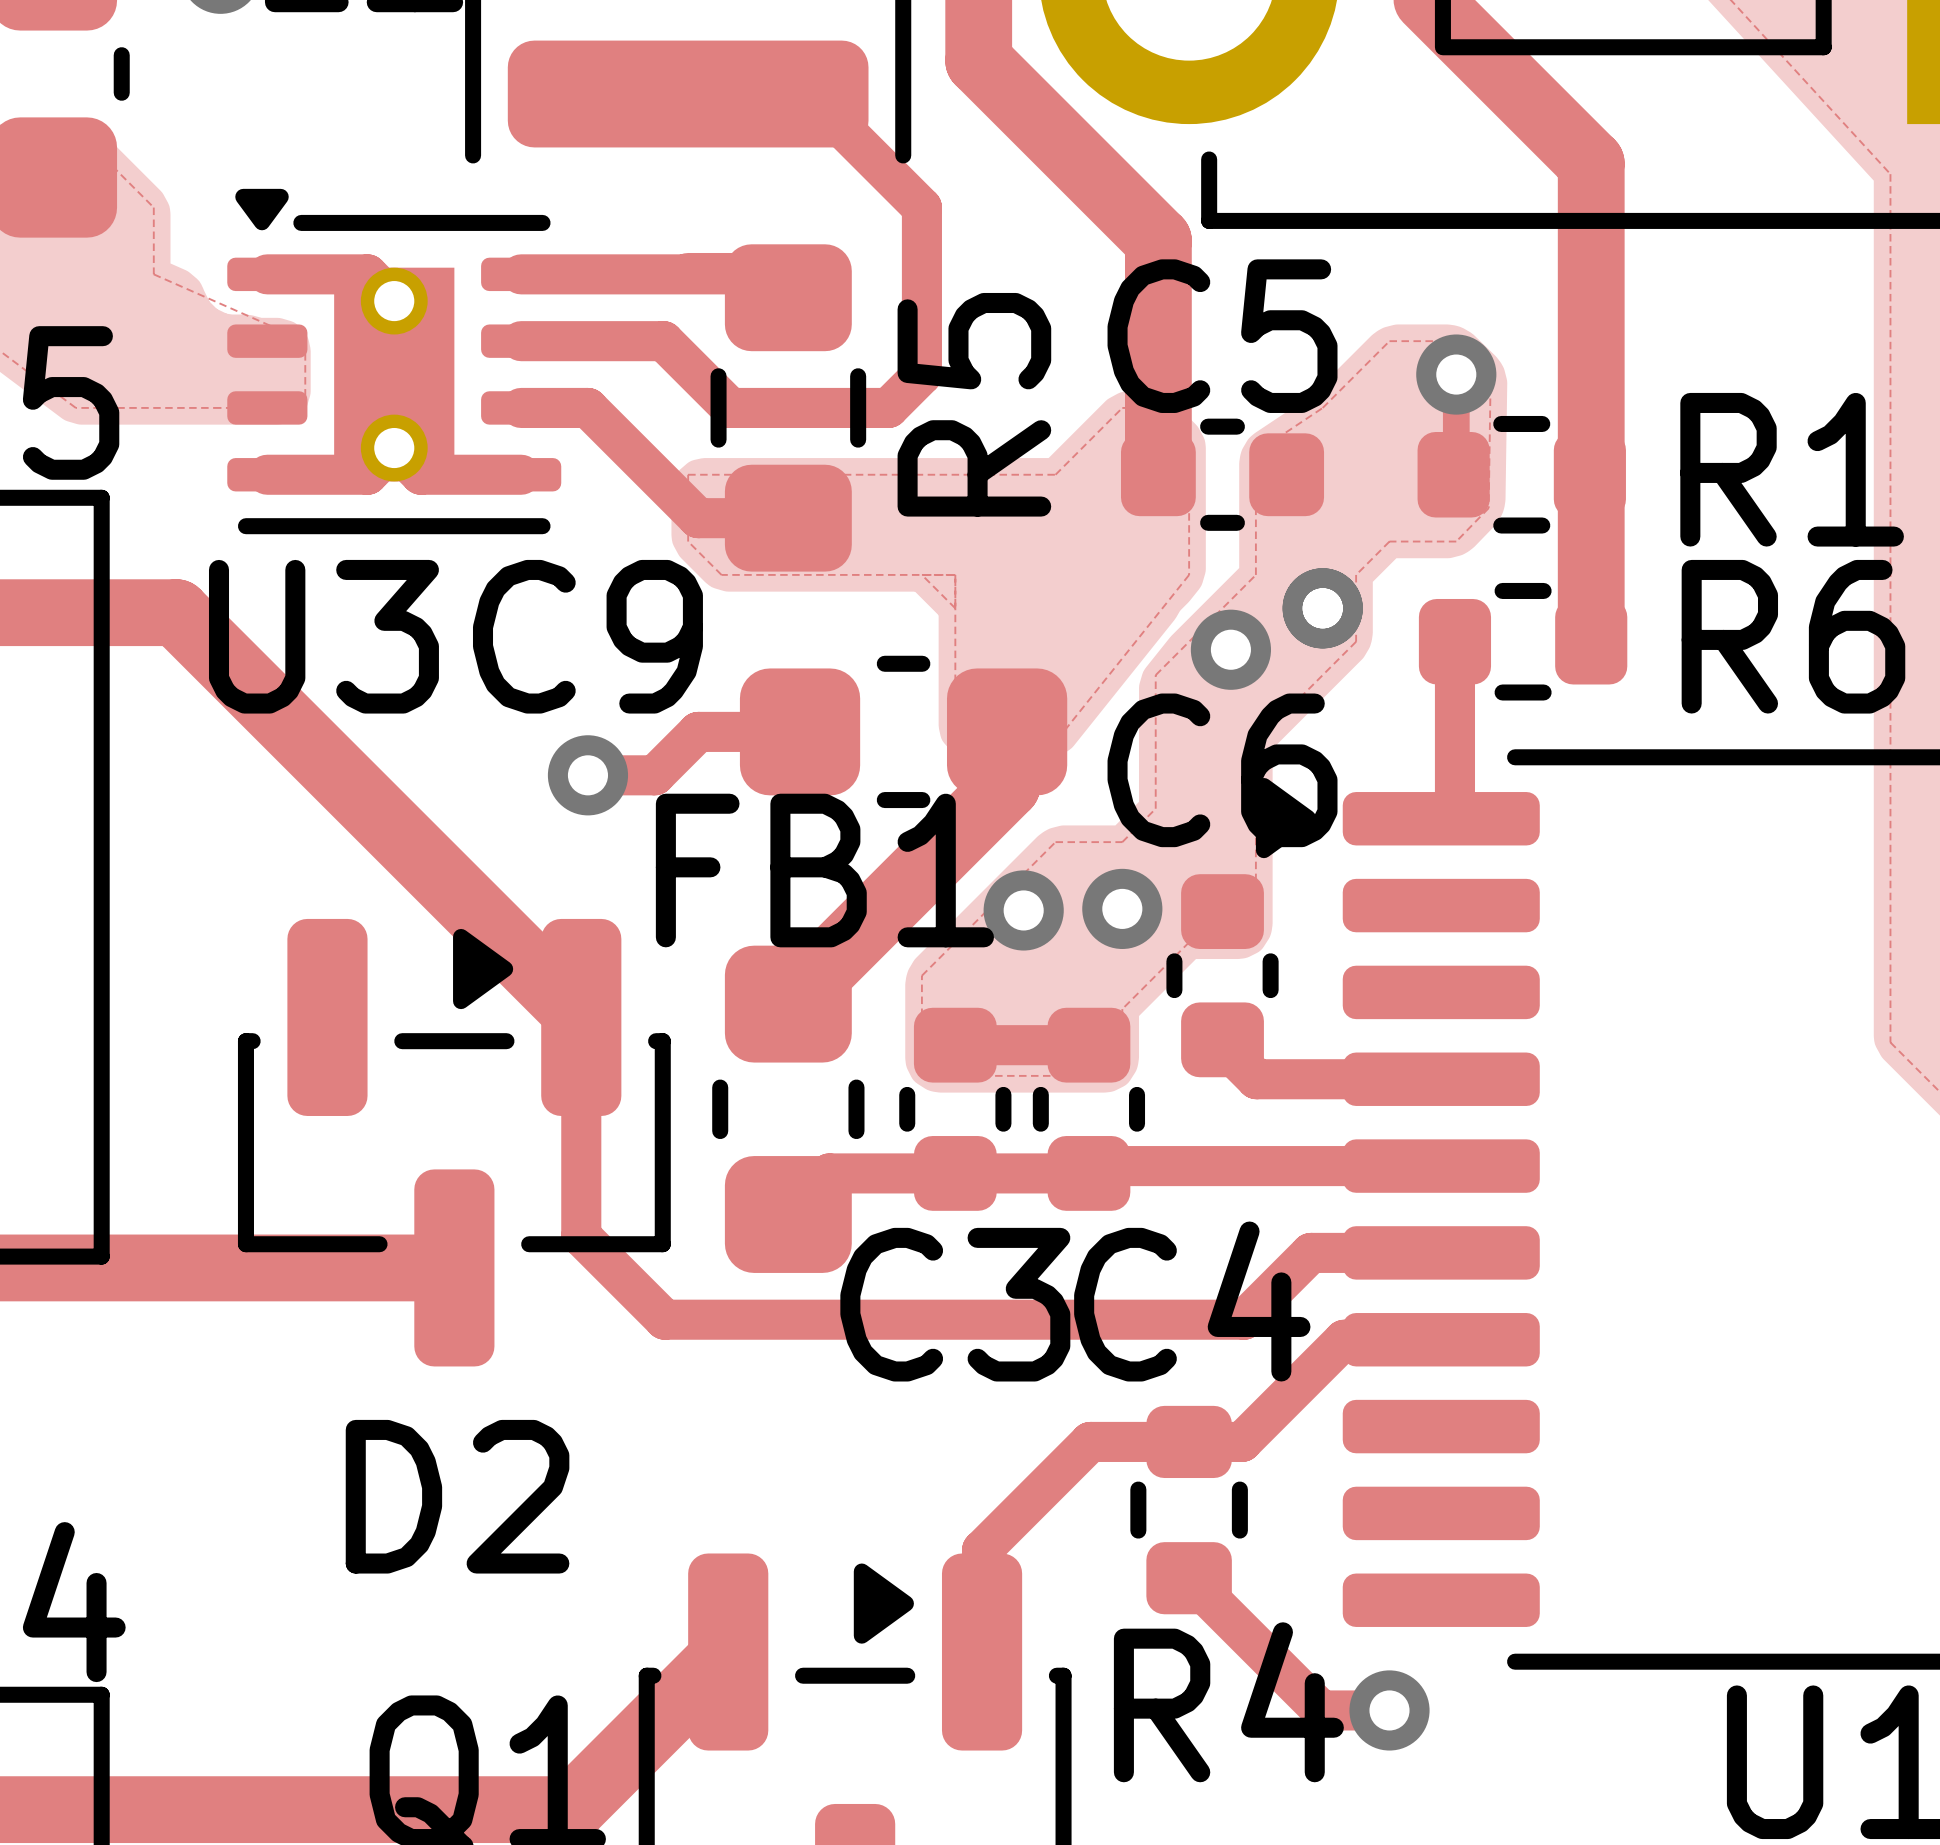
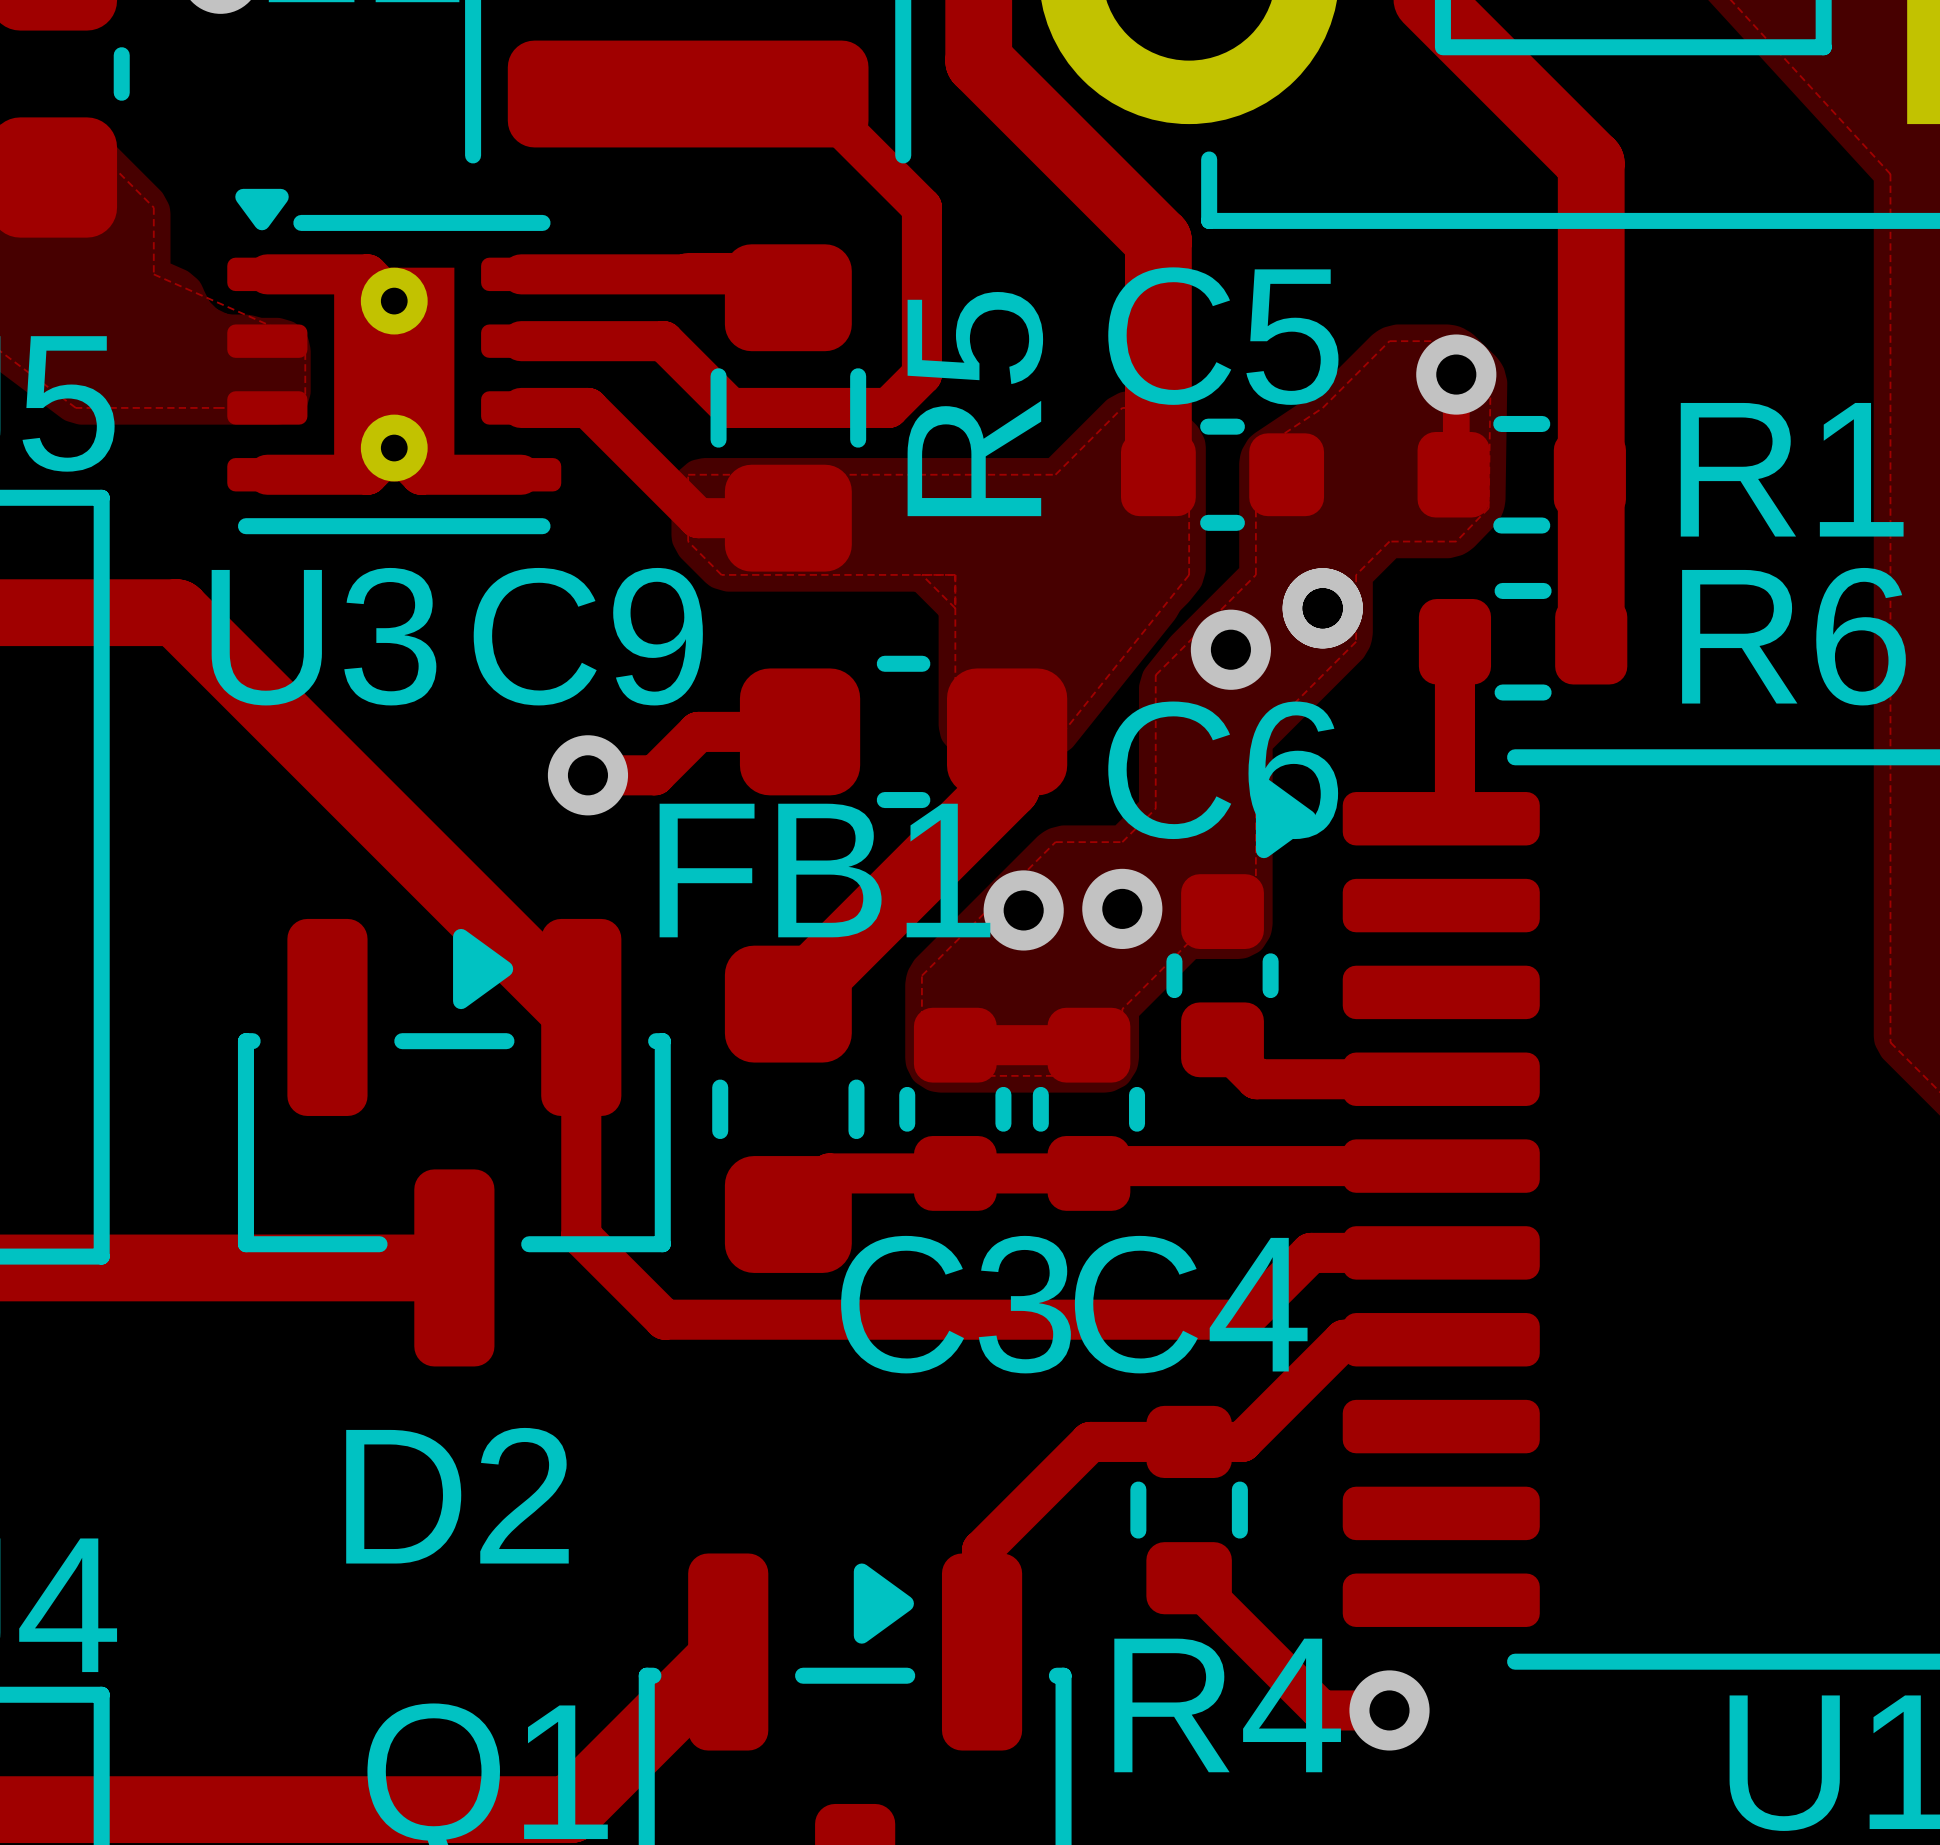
U3 footprint: [227, 188, 562, 535] -> [227, 188, 562, 535]

